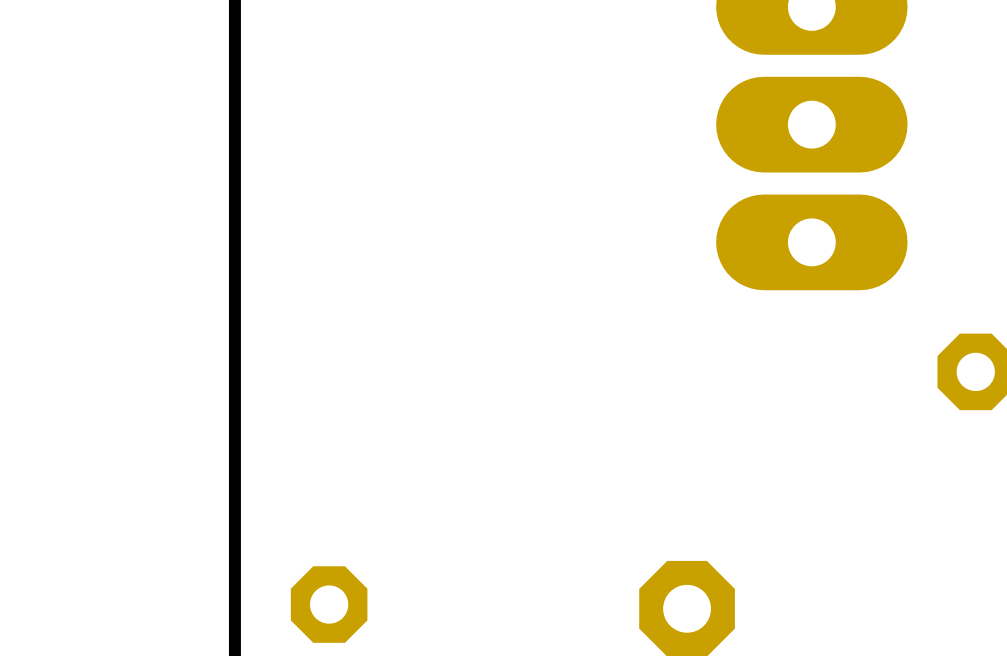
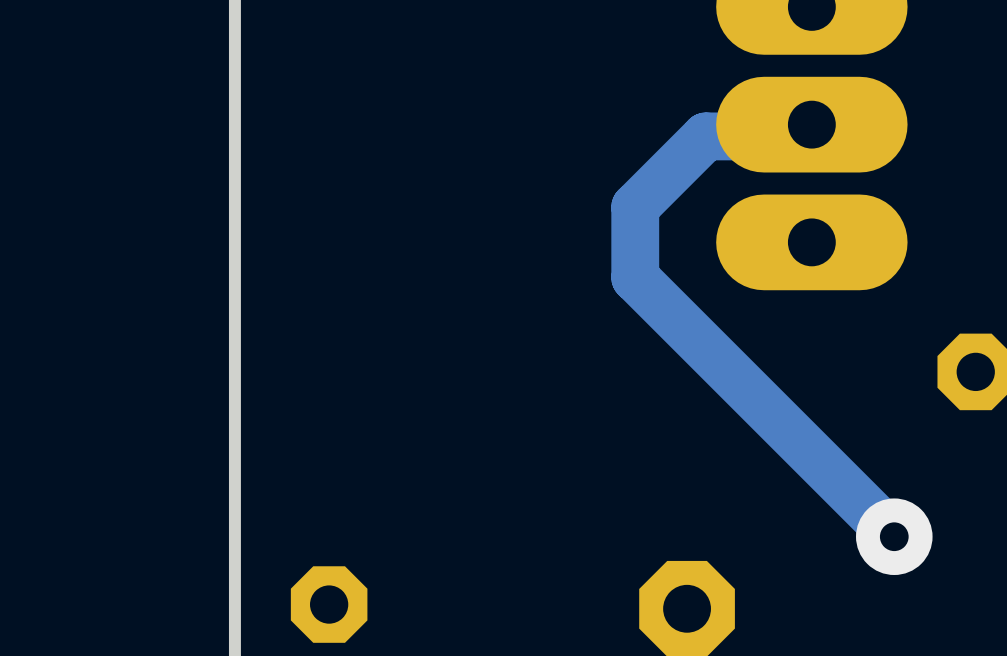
track: none -> (811, 124) (800, 136) (705, 136) (635, 207) (635, 277) (894, 536)
via: none -> (894, 536)

